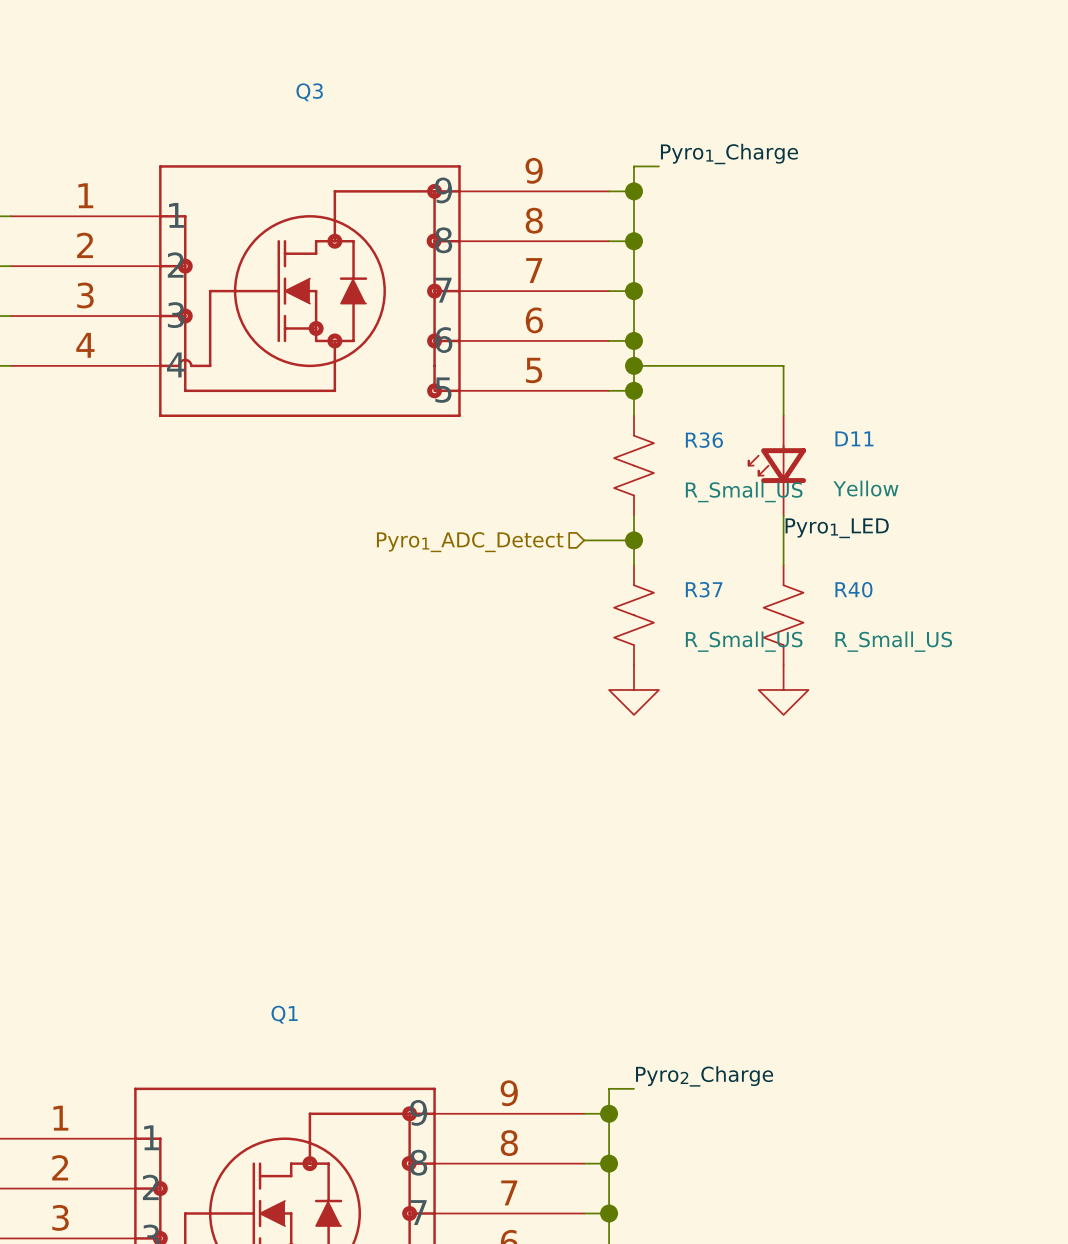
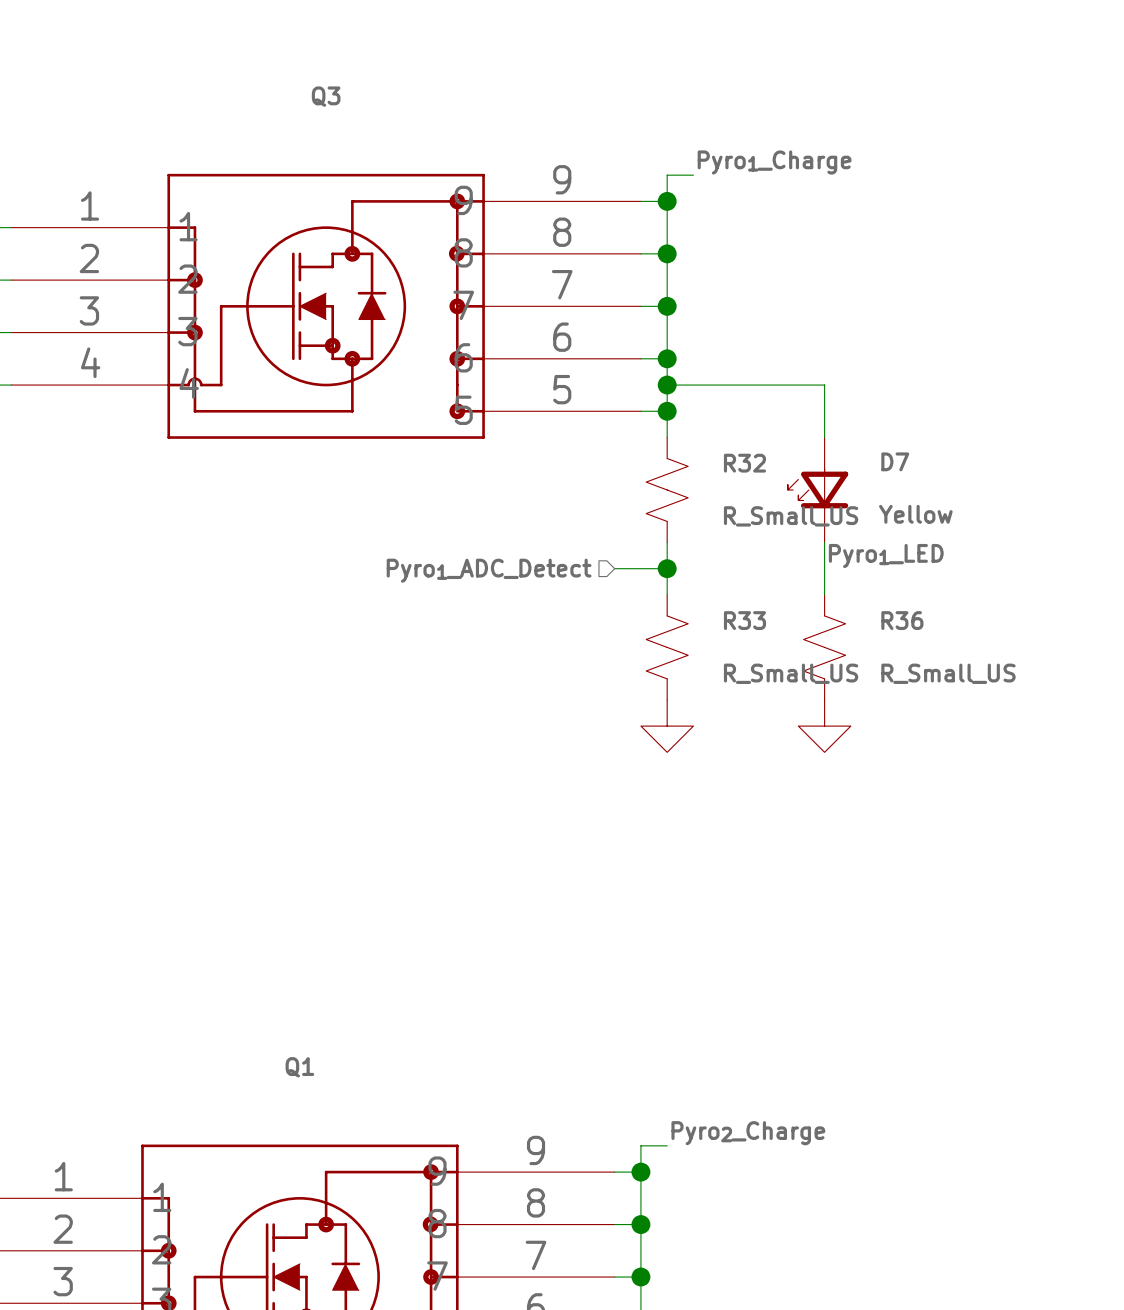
D11 name: D11 (854, 438) -> D7 (895, 461)
R36 name: R36 (704, 440) -> R32 (744, 463)
R37 name: R37 (704, 589) -> R33 (744, 620)
R40 name: R40 (853, 589) -> R36 (902, 620)

